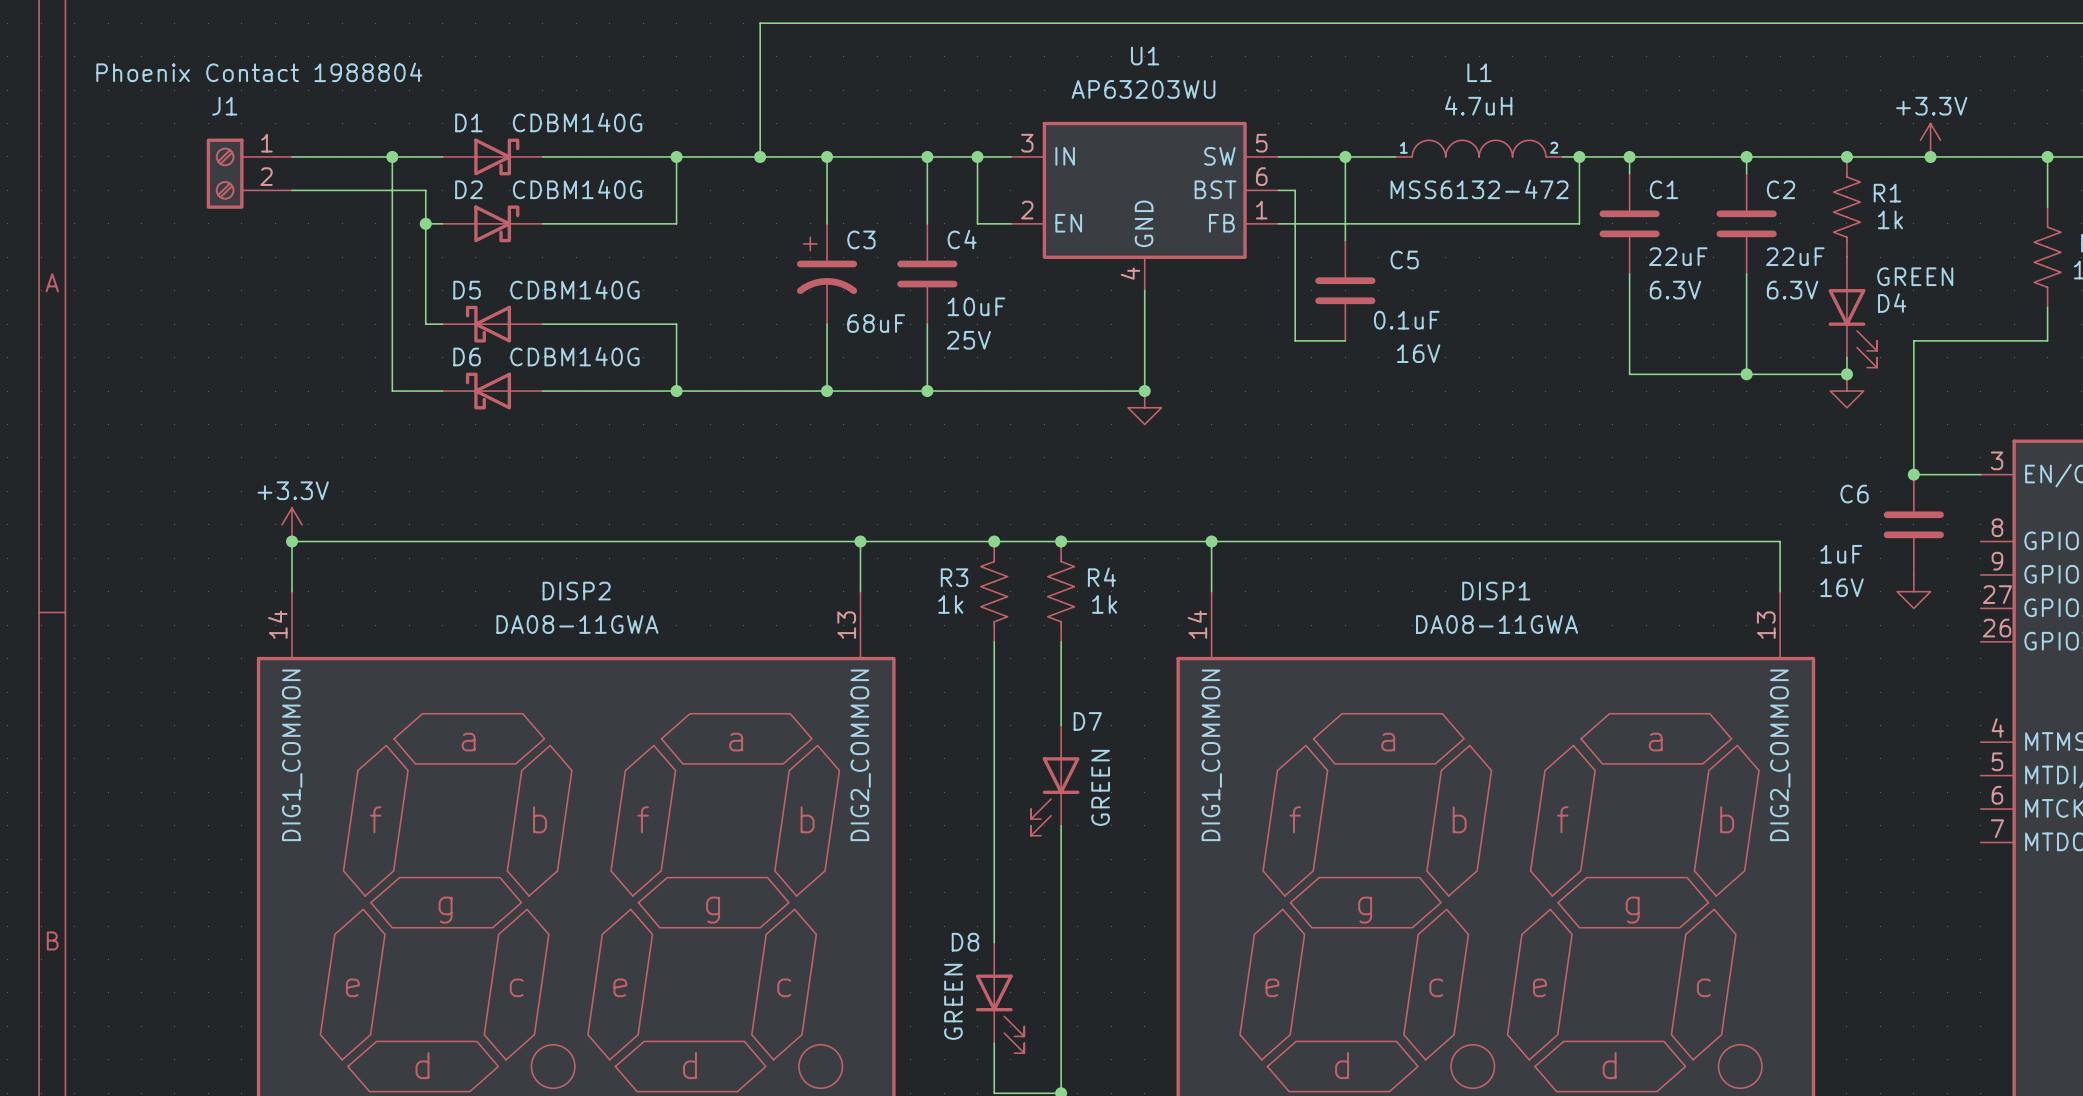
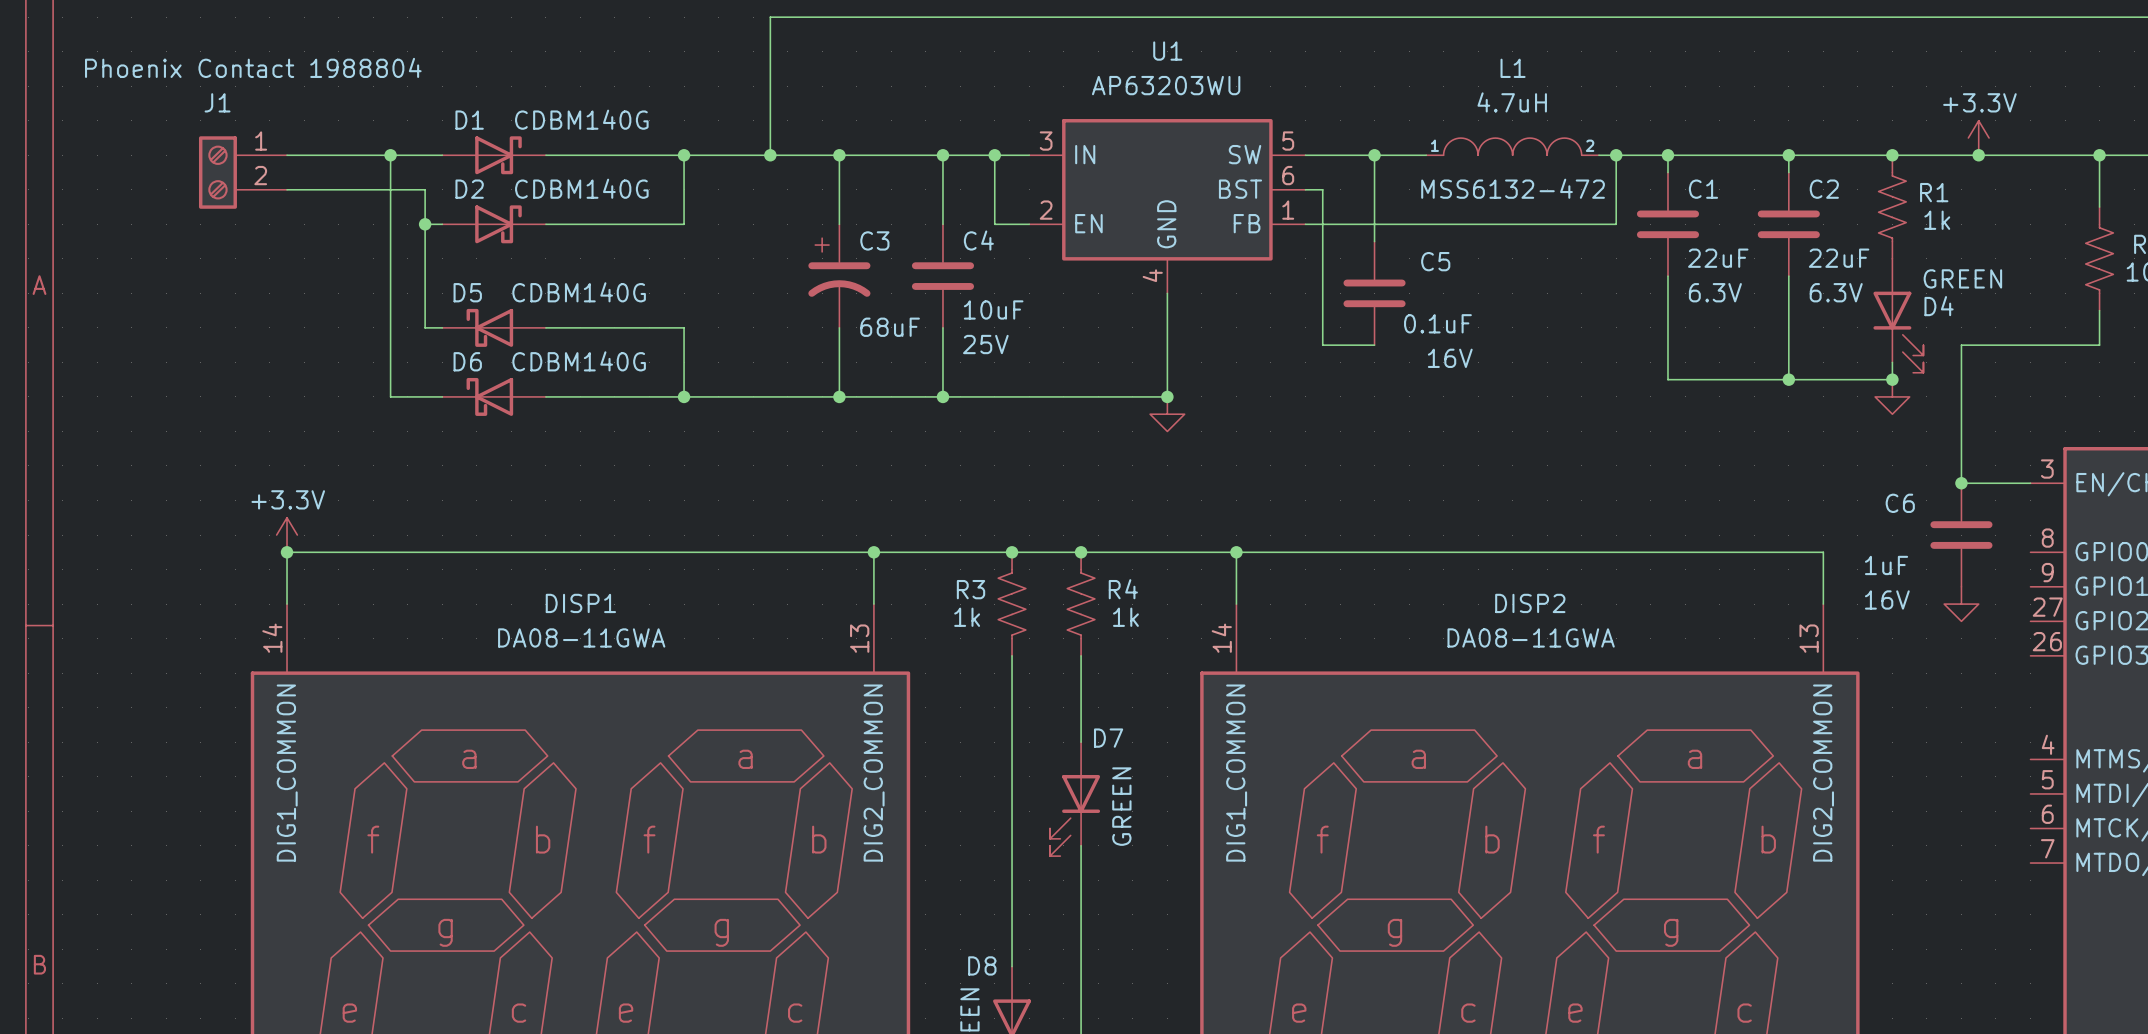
DISP2 name: DISP2 (576, 591) -> DISP1 (580, 603)
DISP1 name: DISP1 (1496, 591) -> DISP2 (1530, 603)

